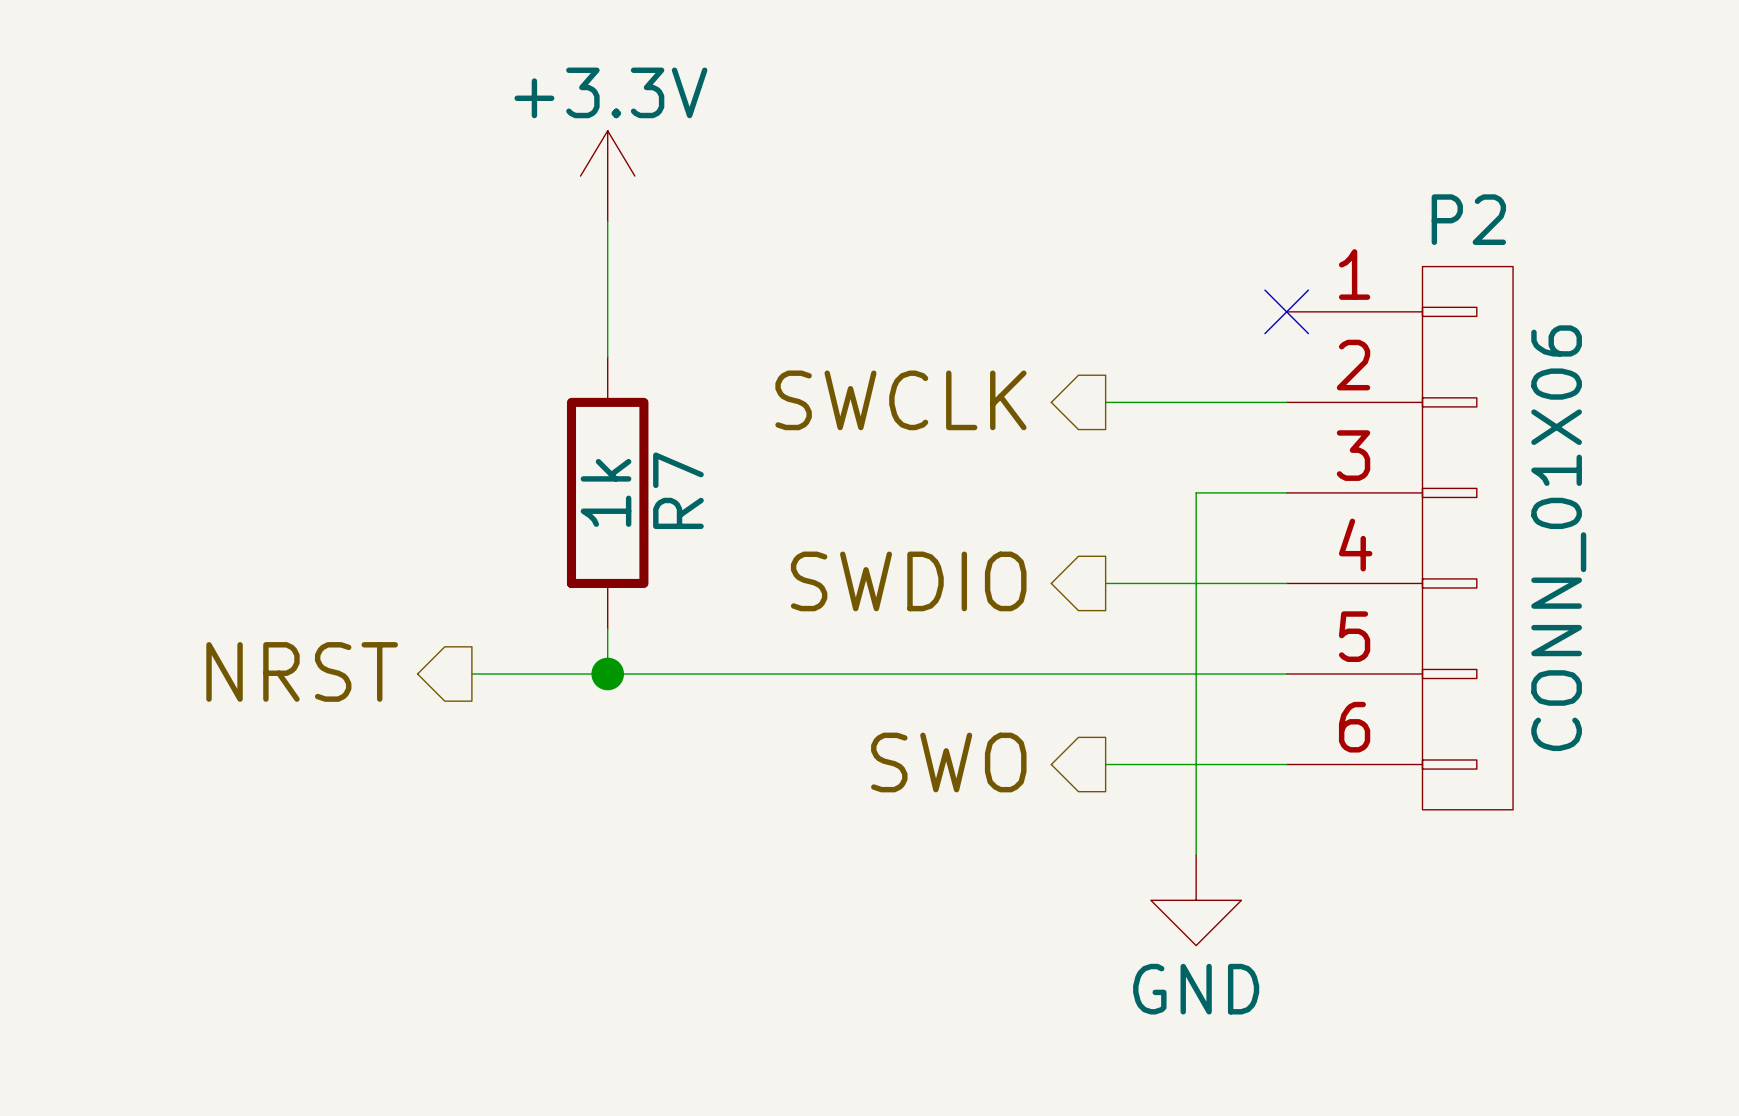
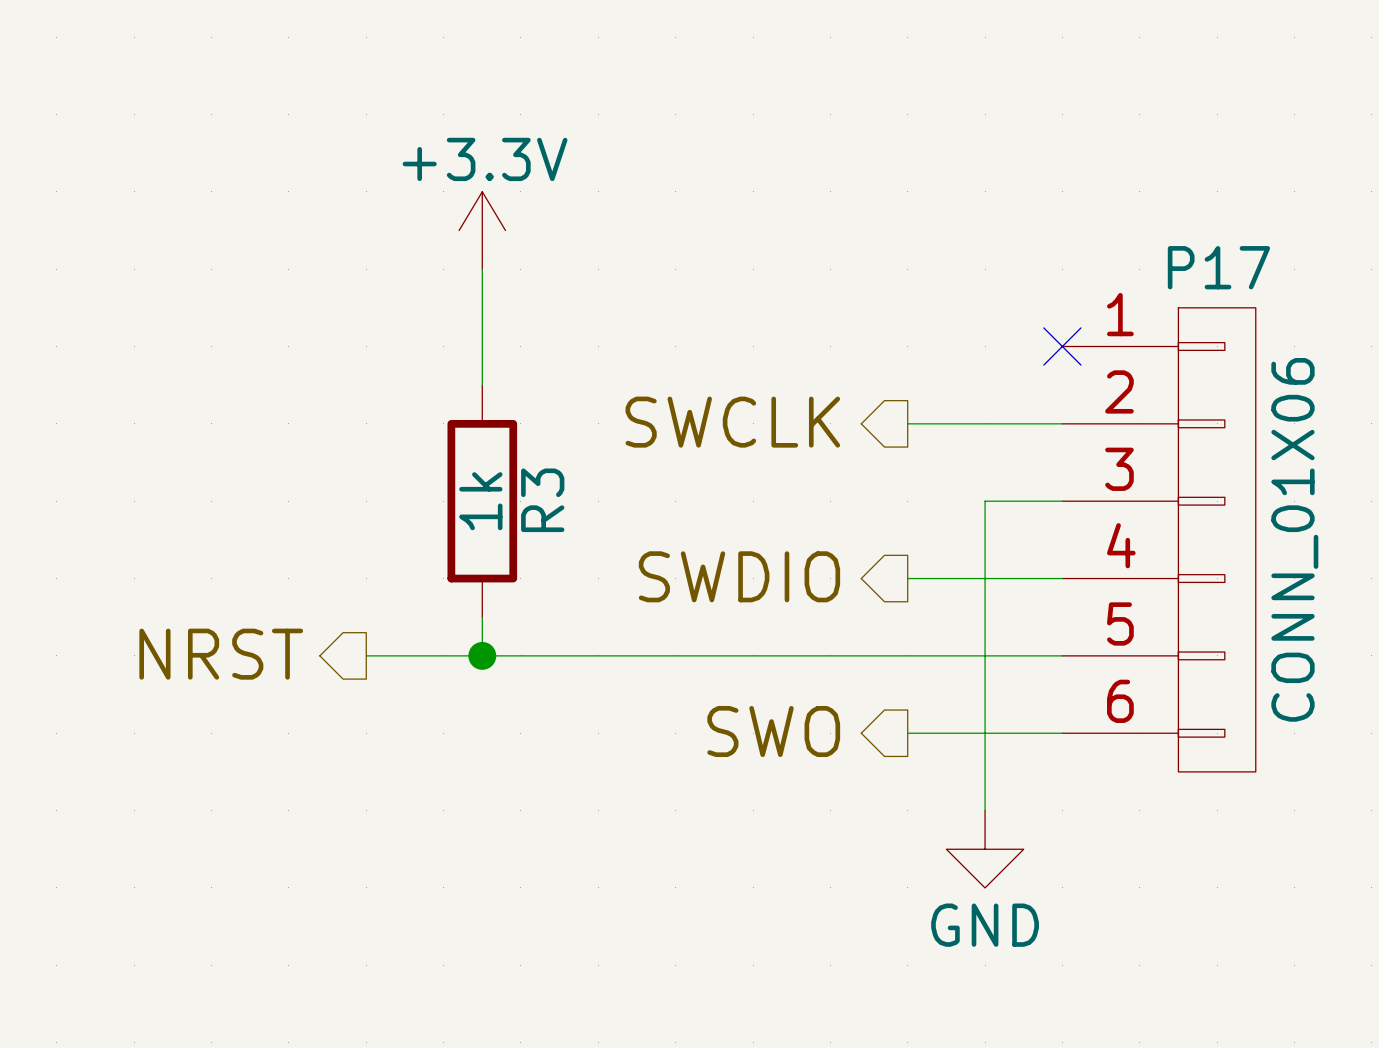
P2 name: P2 (1468, 219) -> P17 (1218, 267)
R7 name: R7 (678, 490) -> R3 (542, 500)

